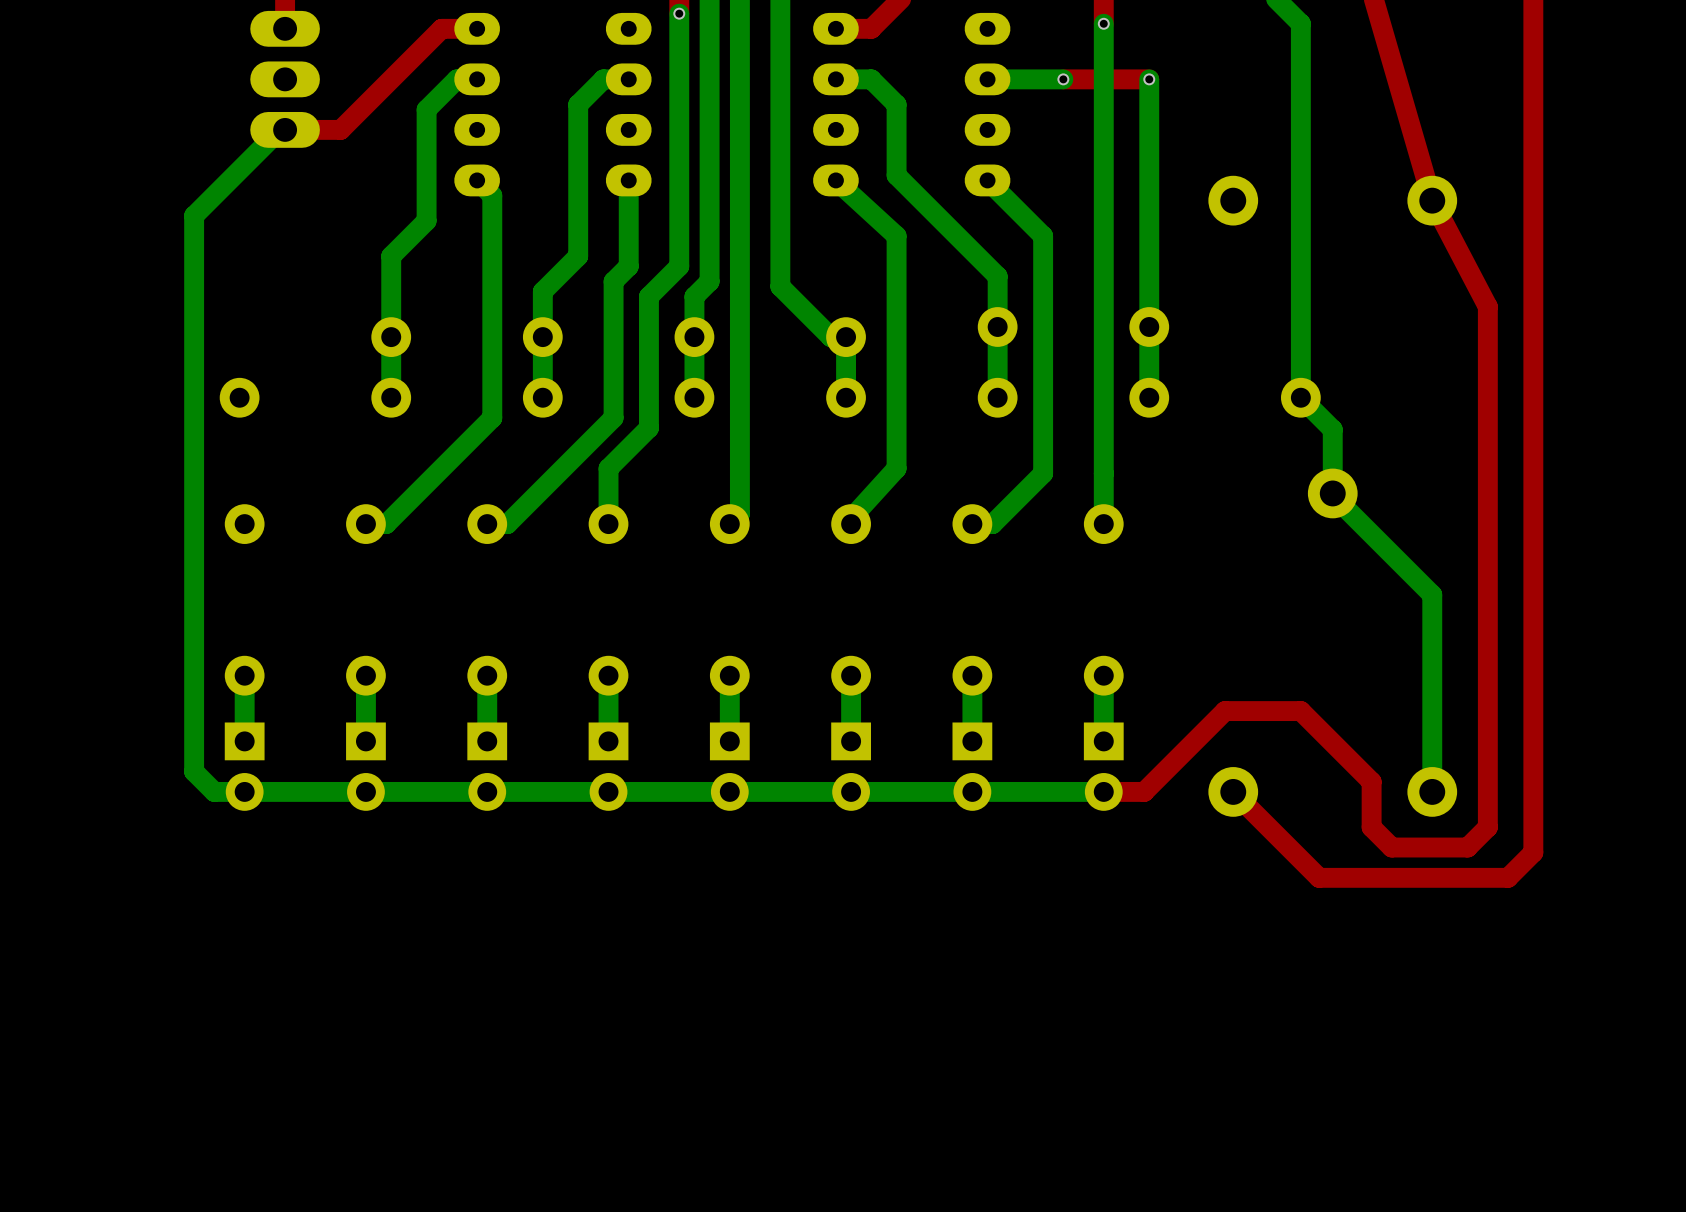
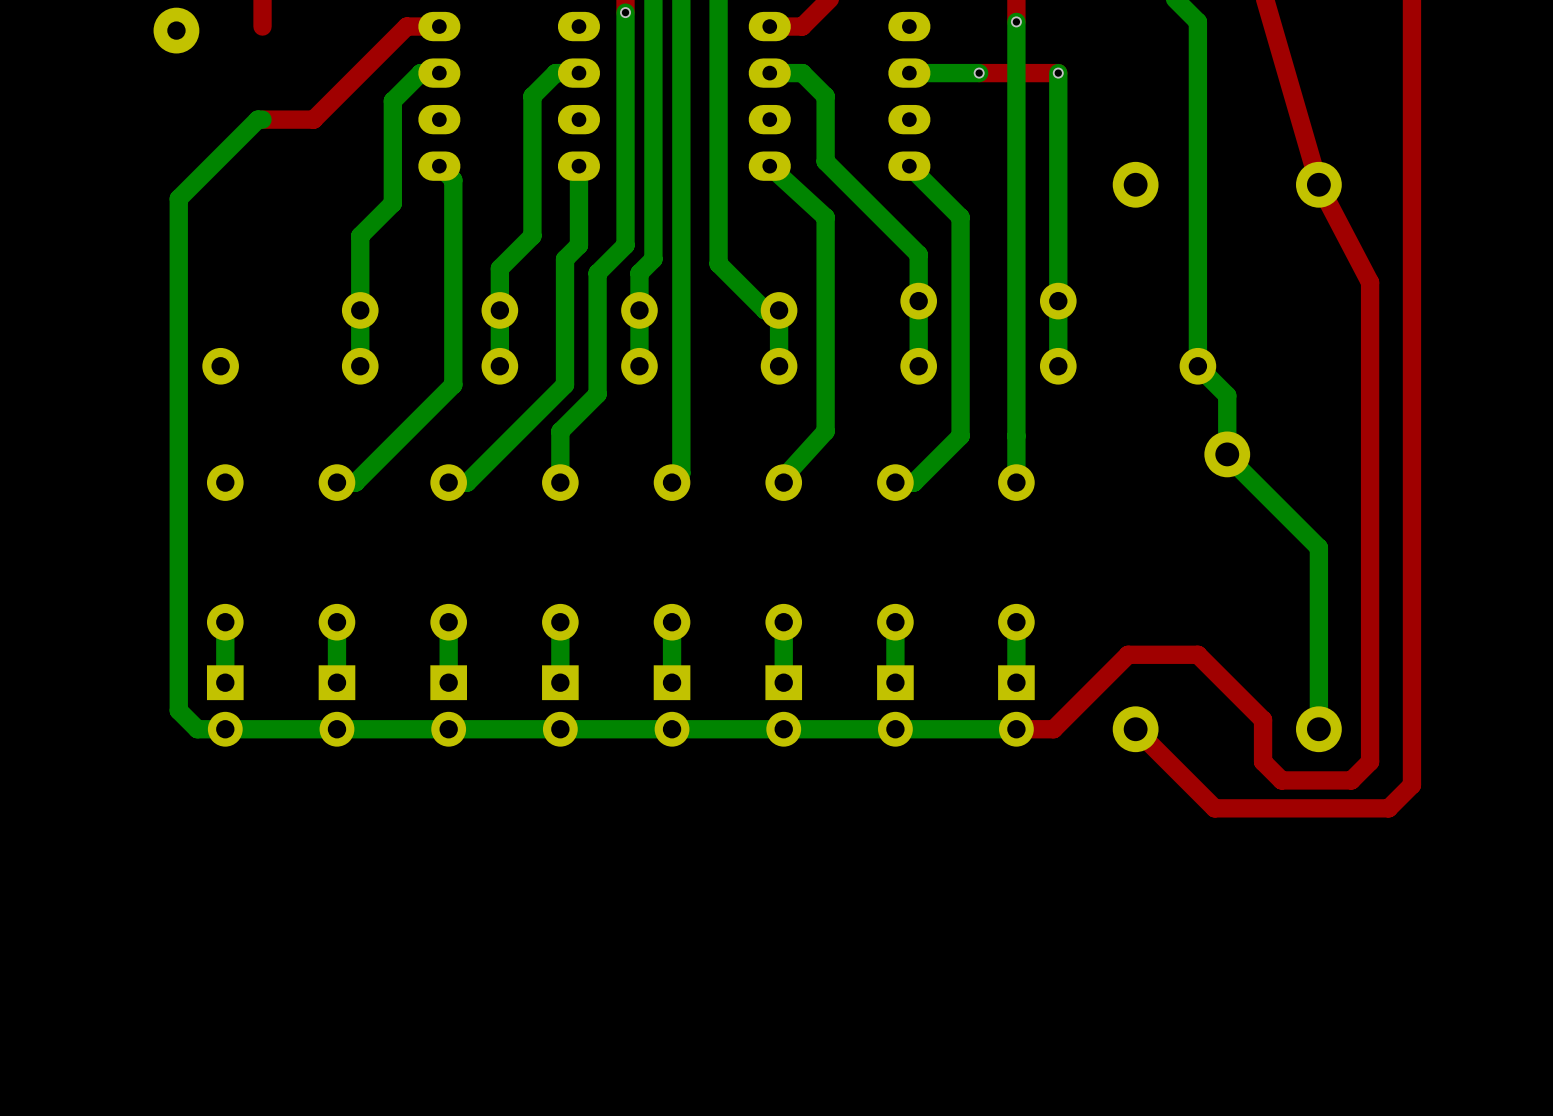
part: none -> (176, 30)
part: (285, 79) -> none

